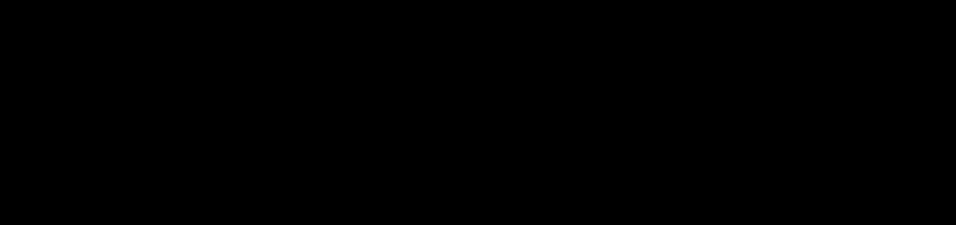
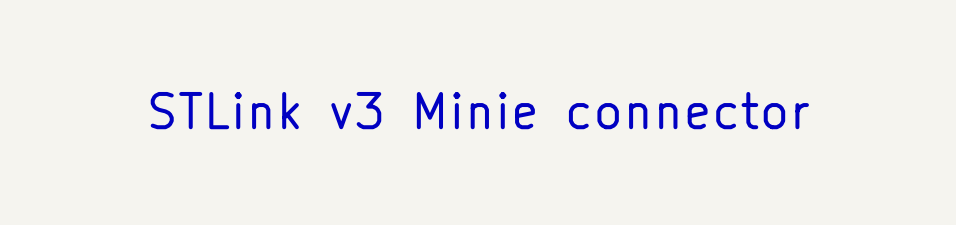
text: none -> STLink v3 Minie connector (479, 110)

